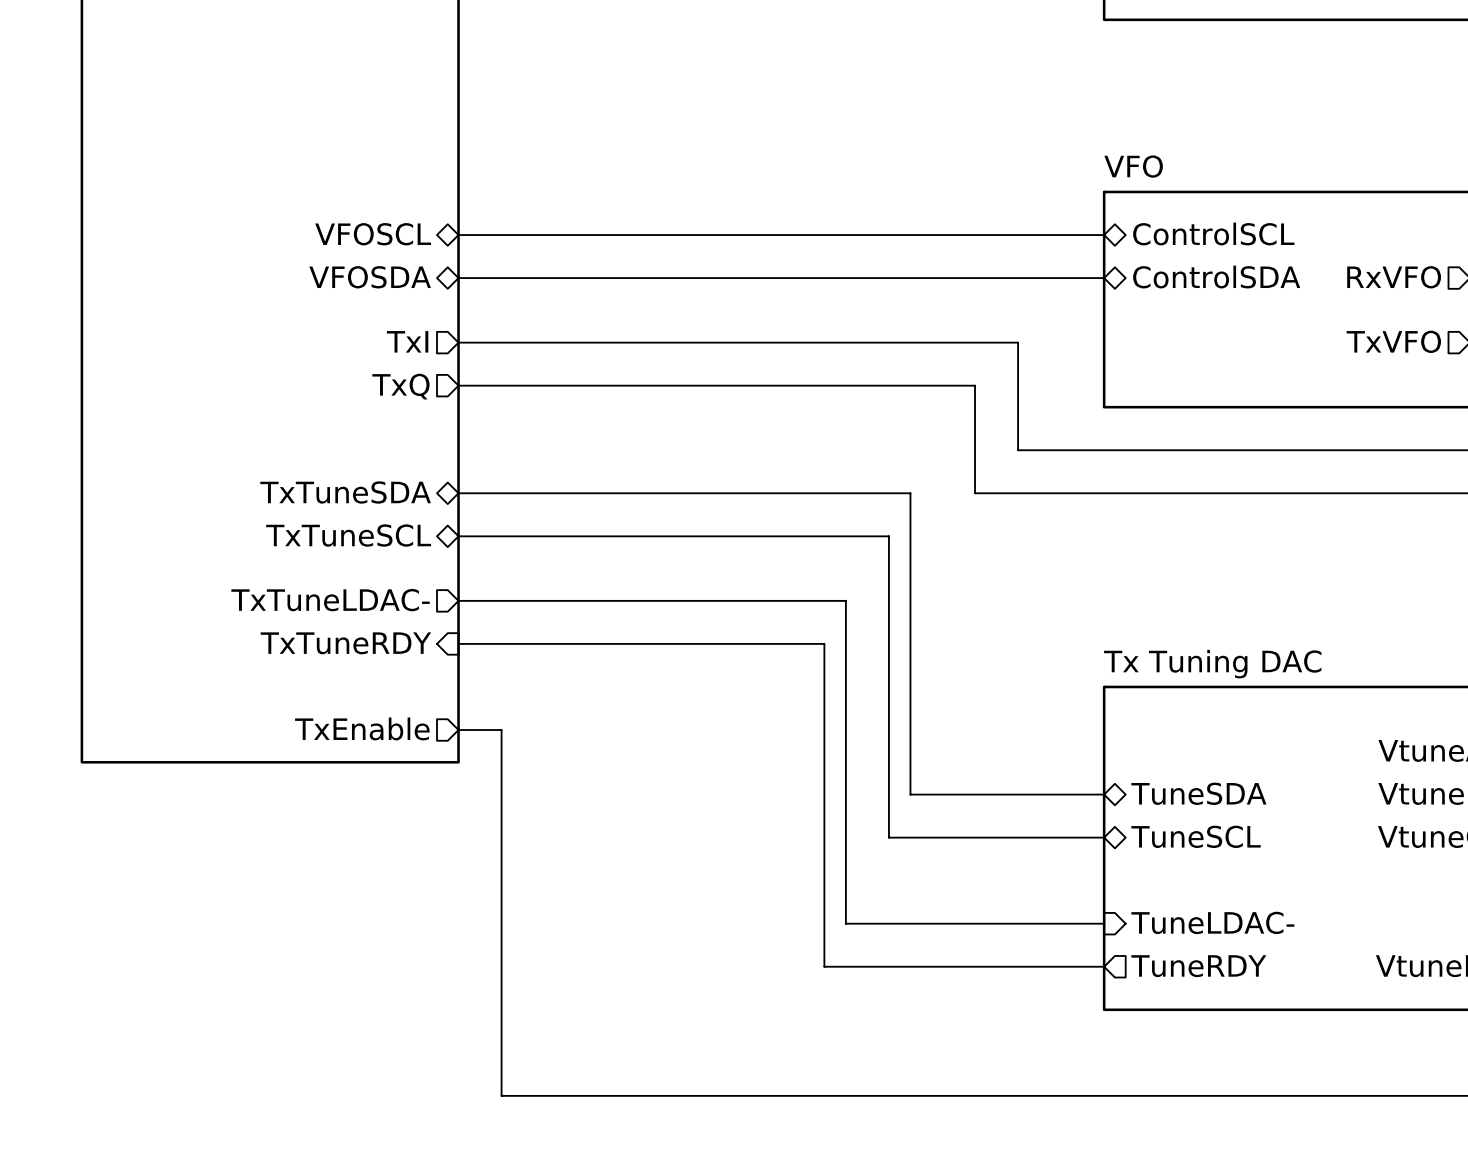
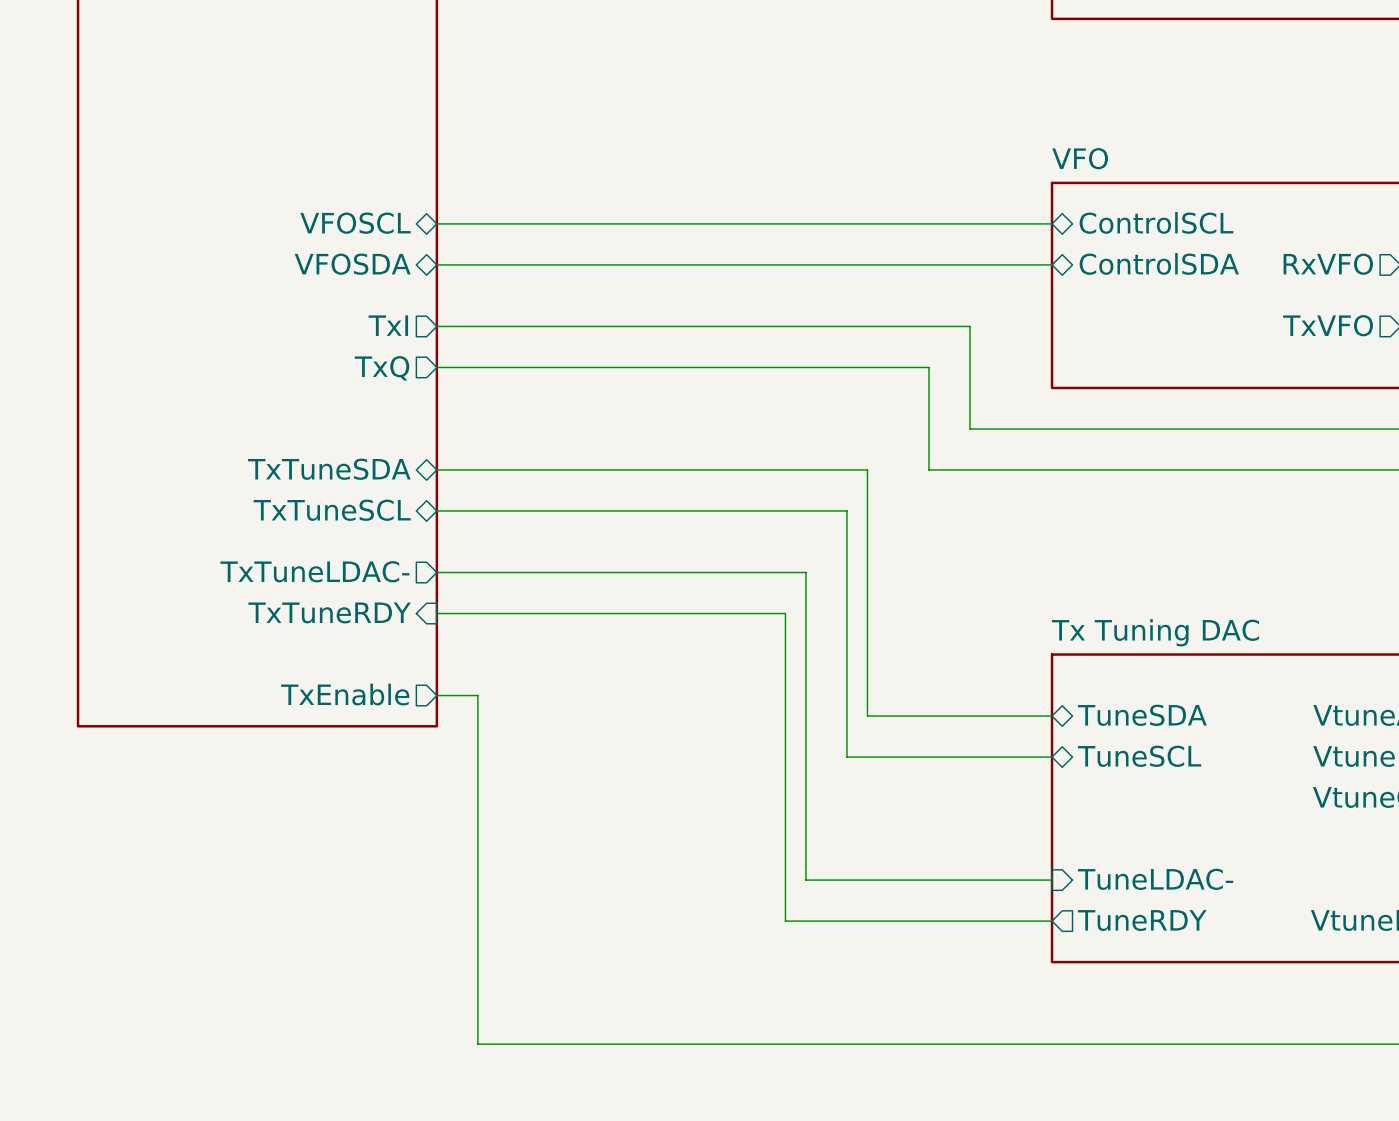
sheet pin: none -> TuneSDA (1142, 715)
wire: (910, 751) (910, 794) -> (846, 757) (867, 757)
wire: none -> (867, 716) (1052, 716)
sheet pin: TuneSDA (1198, 793) -> TuneSCL (1139, 756)
wire: (888, 794) (888, 837) (1104, 837) -> none
sheet pin: TuneSCL (1196, 836) -> none

